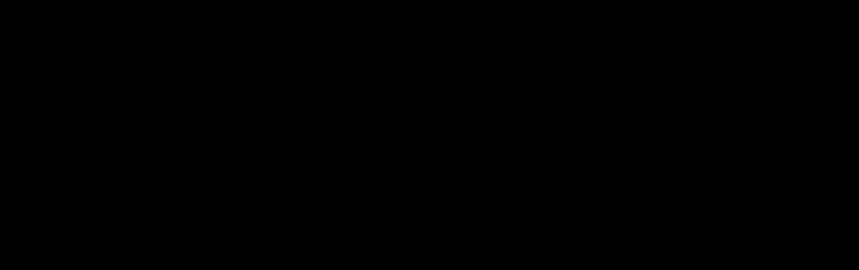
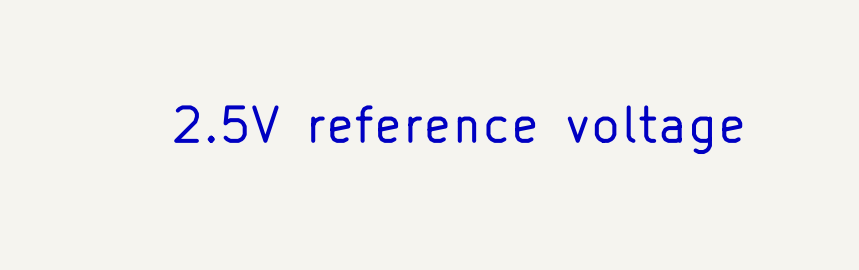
text: none -> 2.5V reference voltage (458, 129)

